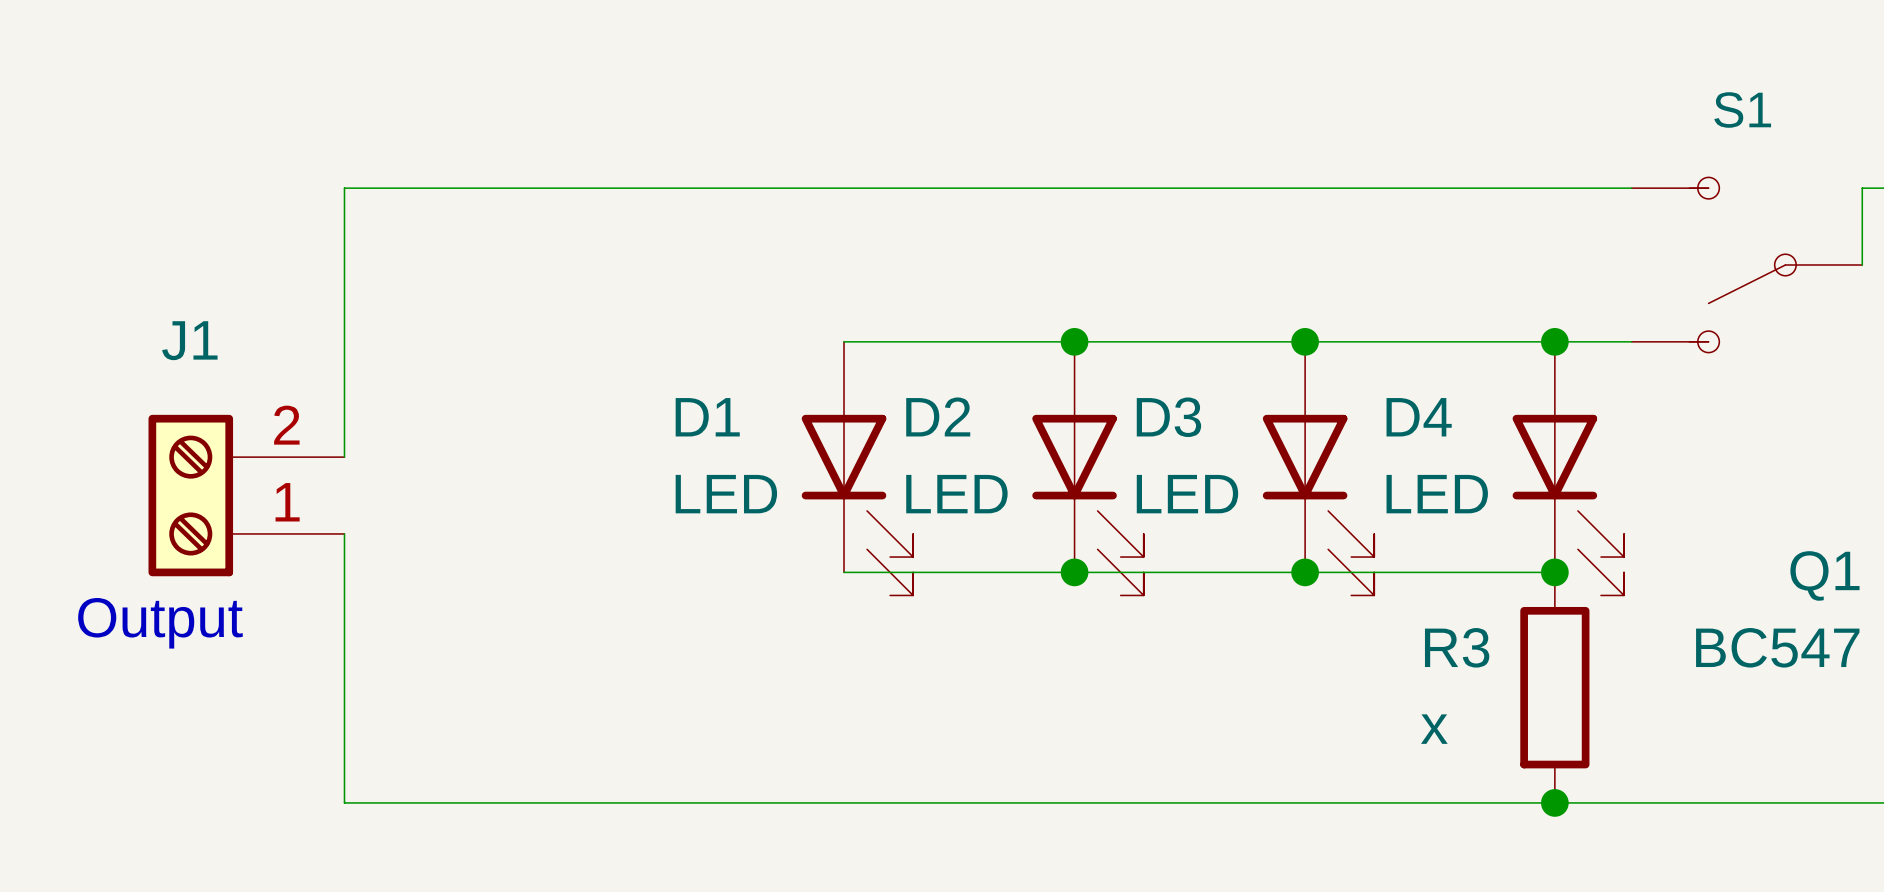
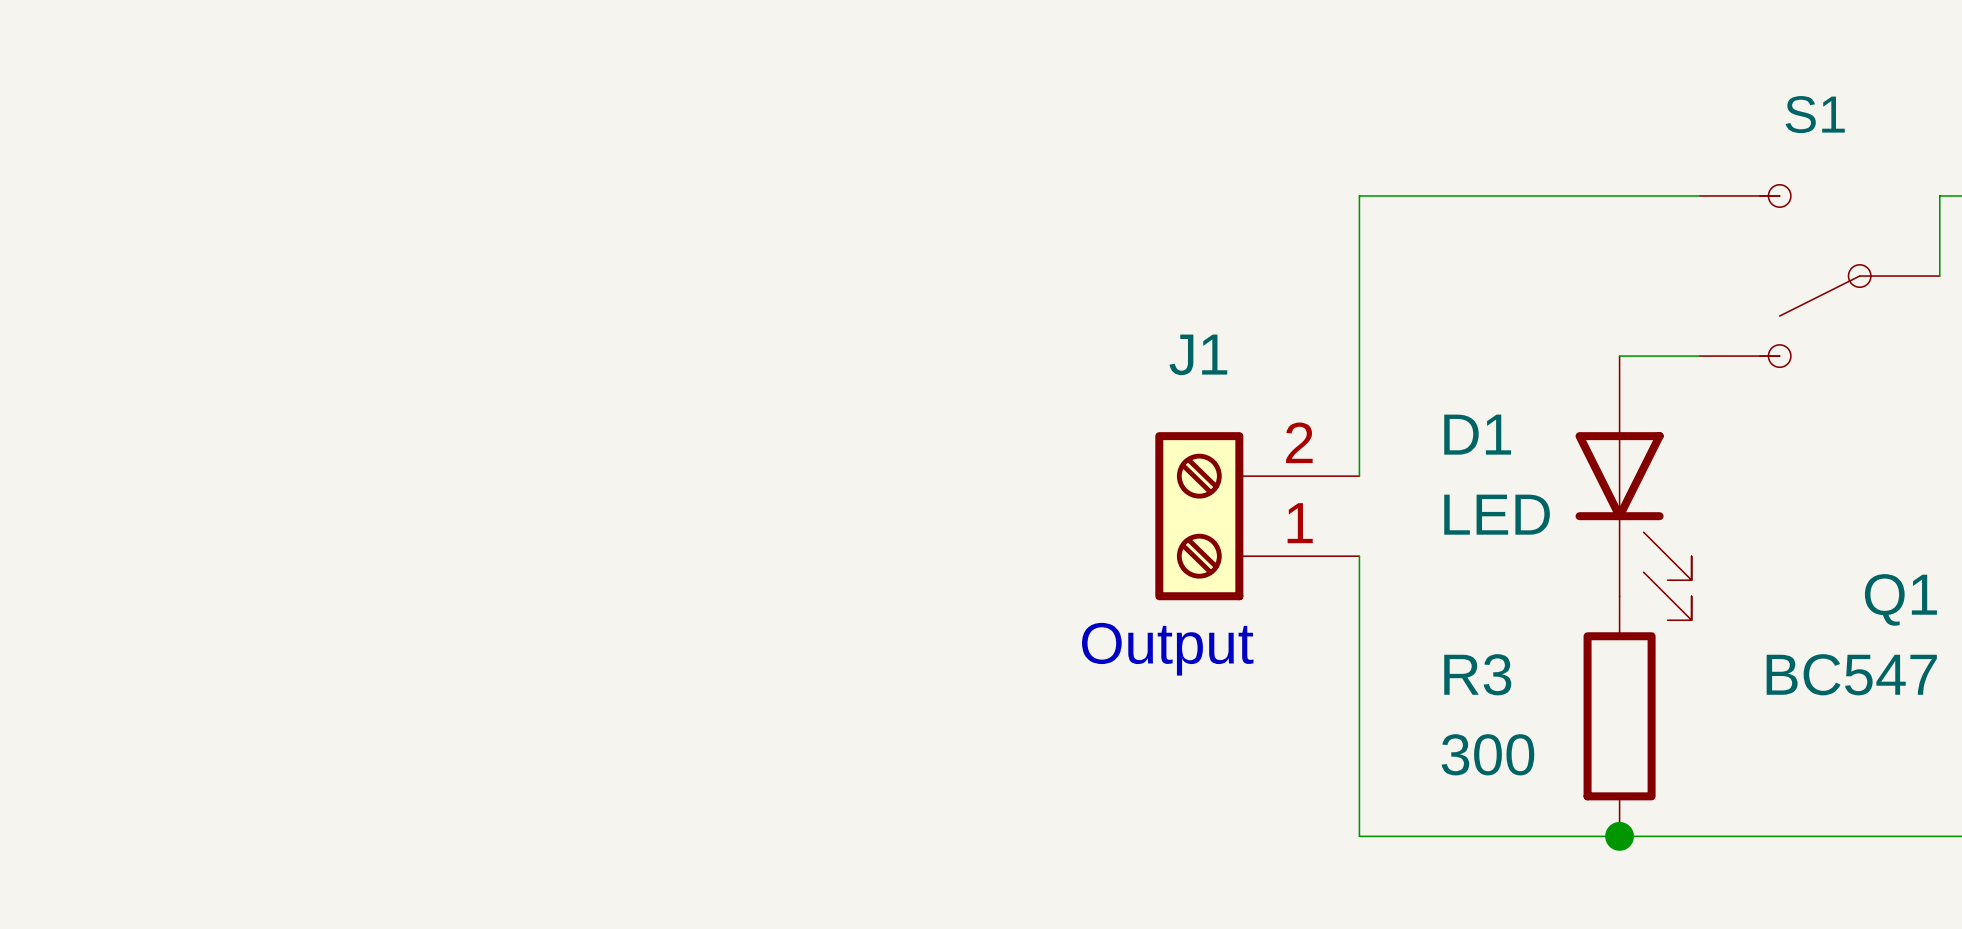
wire: (1305, 188) (344, 188) (344, 457) -> (1359, 195) (1359, 476)
wire: (844, 341) (1554, 341) -> none
junction: (1074, 341) -> none
junction: (1305, 341) -> none
junction: (1554, 341) -> none
D4 name: D4 (1419, 417) -> D1 (1477, 434)
D1: LED (857, 468) -> none
D2: LED (1088, 468) -> none
D3: LED (1318, 468) -> none
J1 position: (246, 495) -> (1257, 516)
wire: (344, 533) (344, 802) (1305, 802) -> (1359, 556) (1359, 836)
wire: (844, 572) (1554, 572) -> none
junction: (1074, 572) -> none
junction: (1305, 572) -> none
junction: (1554, 572) -> none
text: Output (160, 623) -> none
text: none -> Output (1167, 649)
R3 name position: R3 (1457, 647) -> R3 (1477, 674)
R3 value: x (1434, 729) -> 300 (1487, 754)

